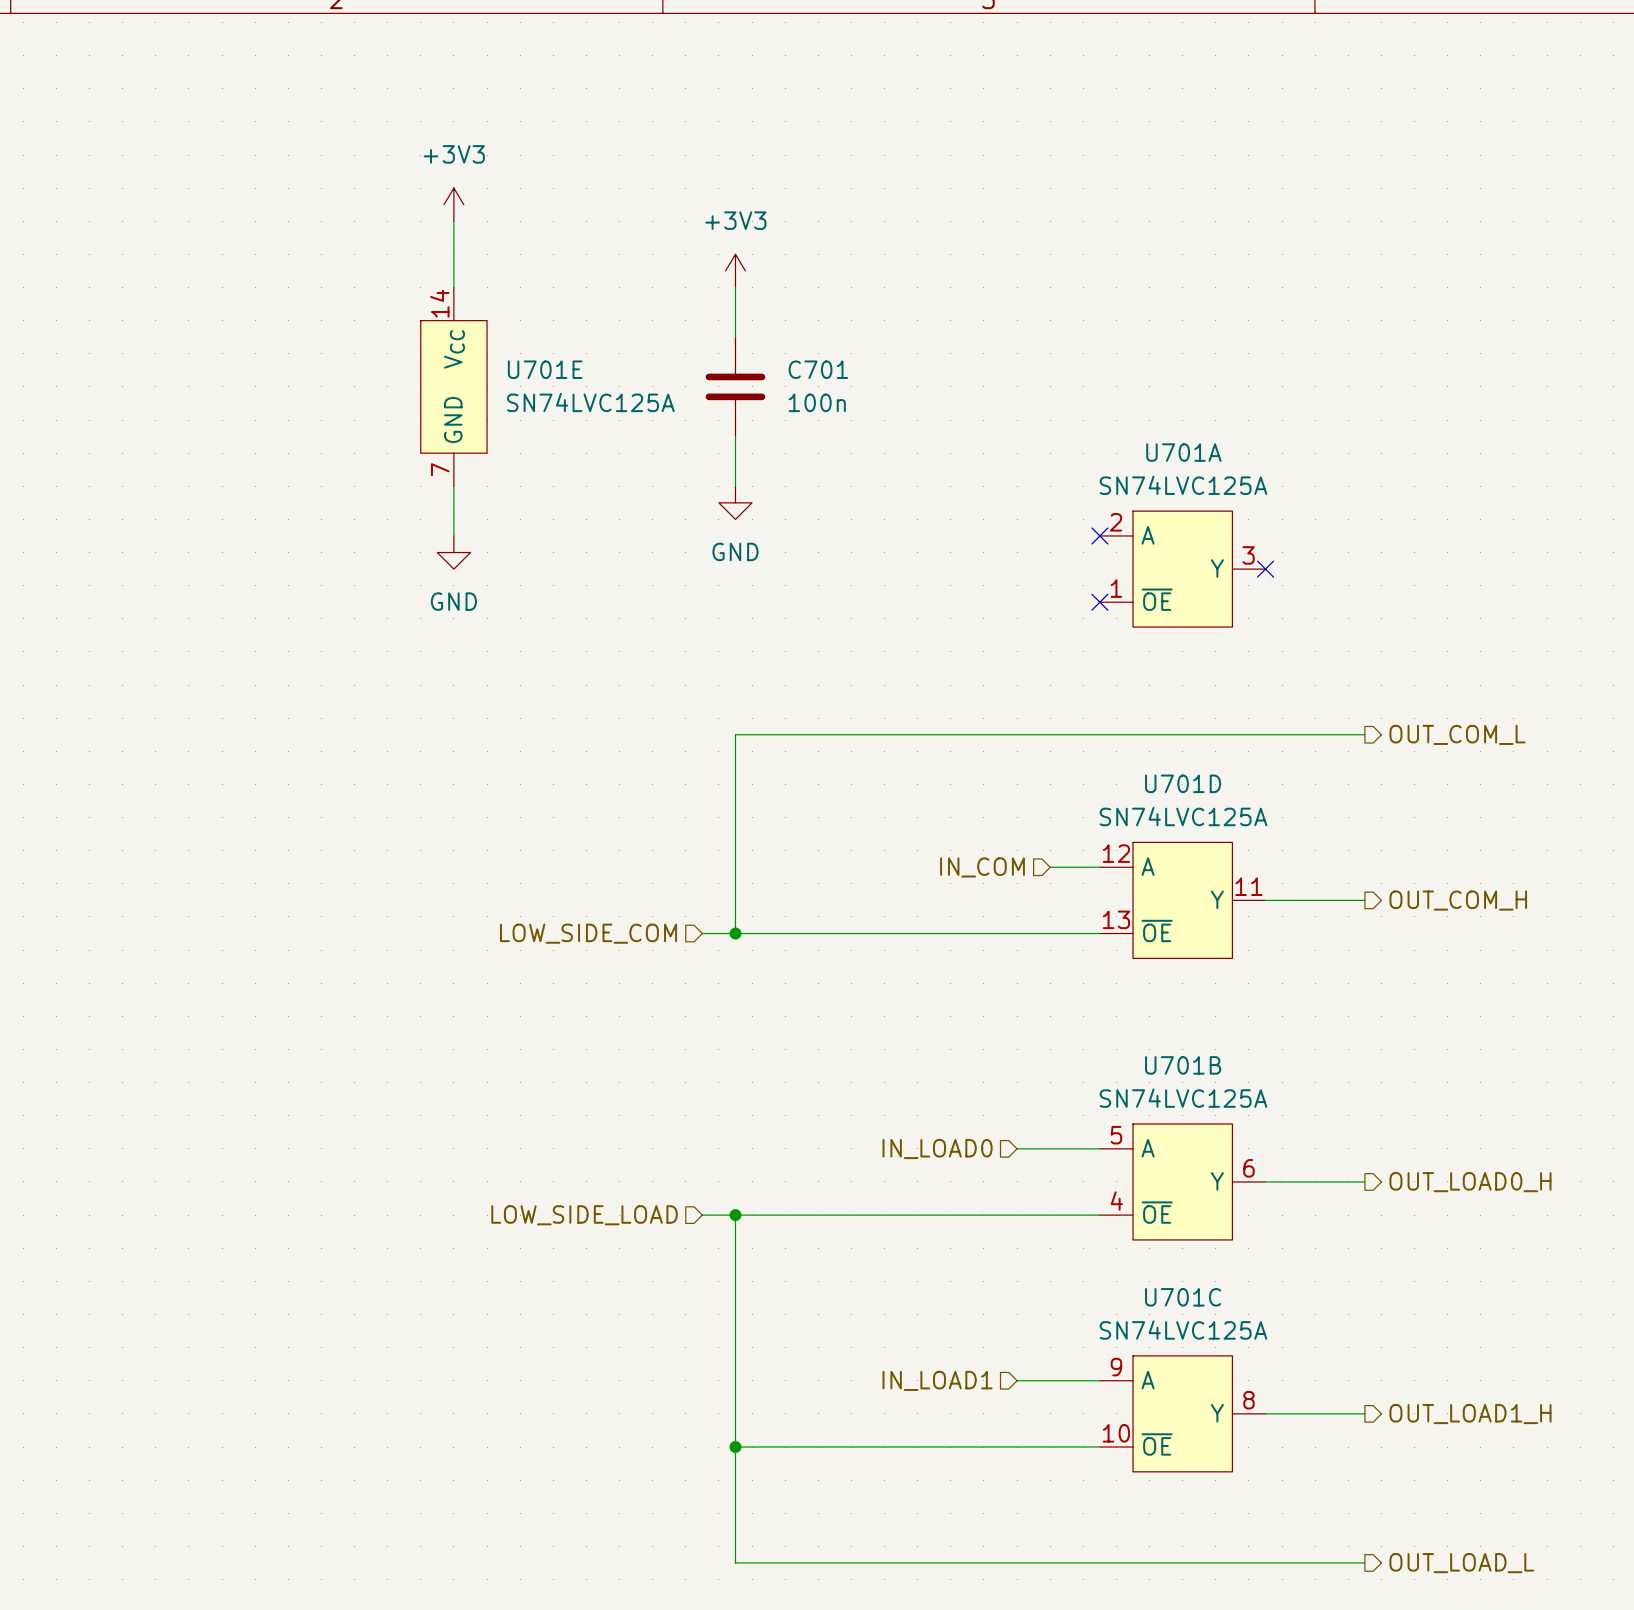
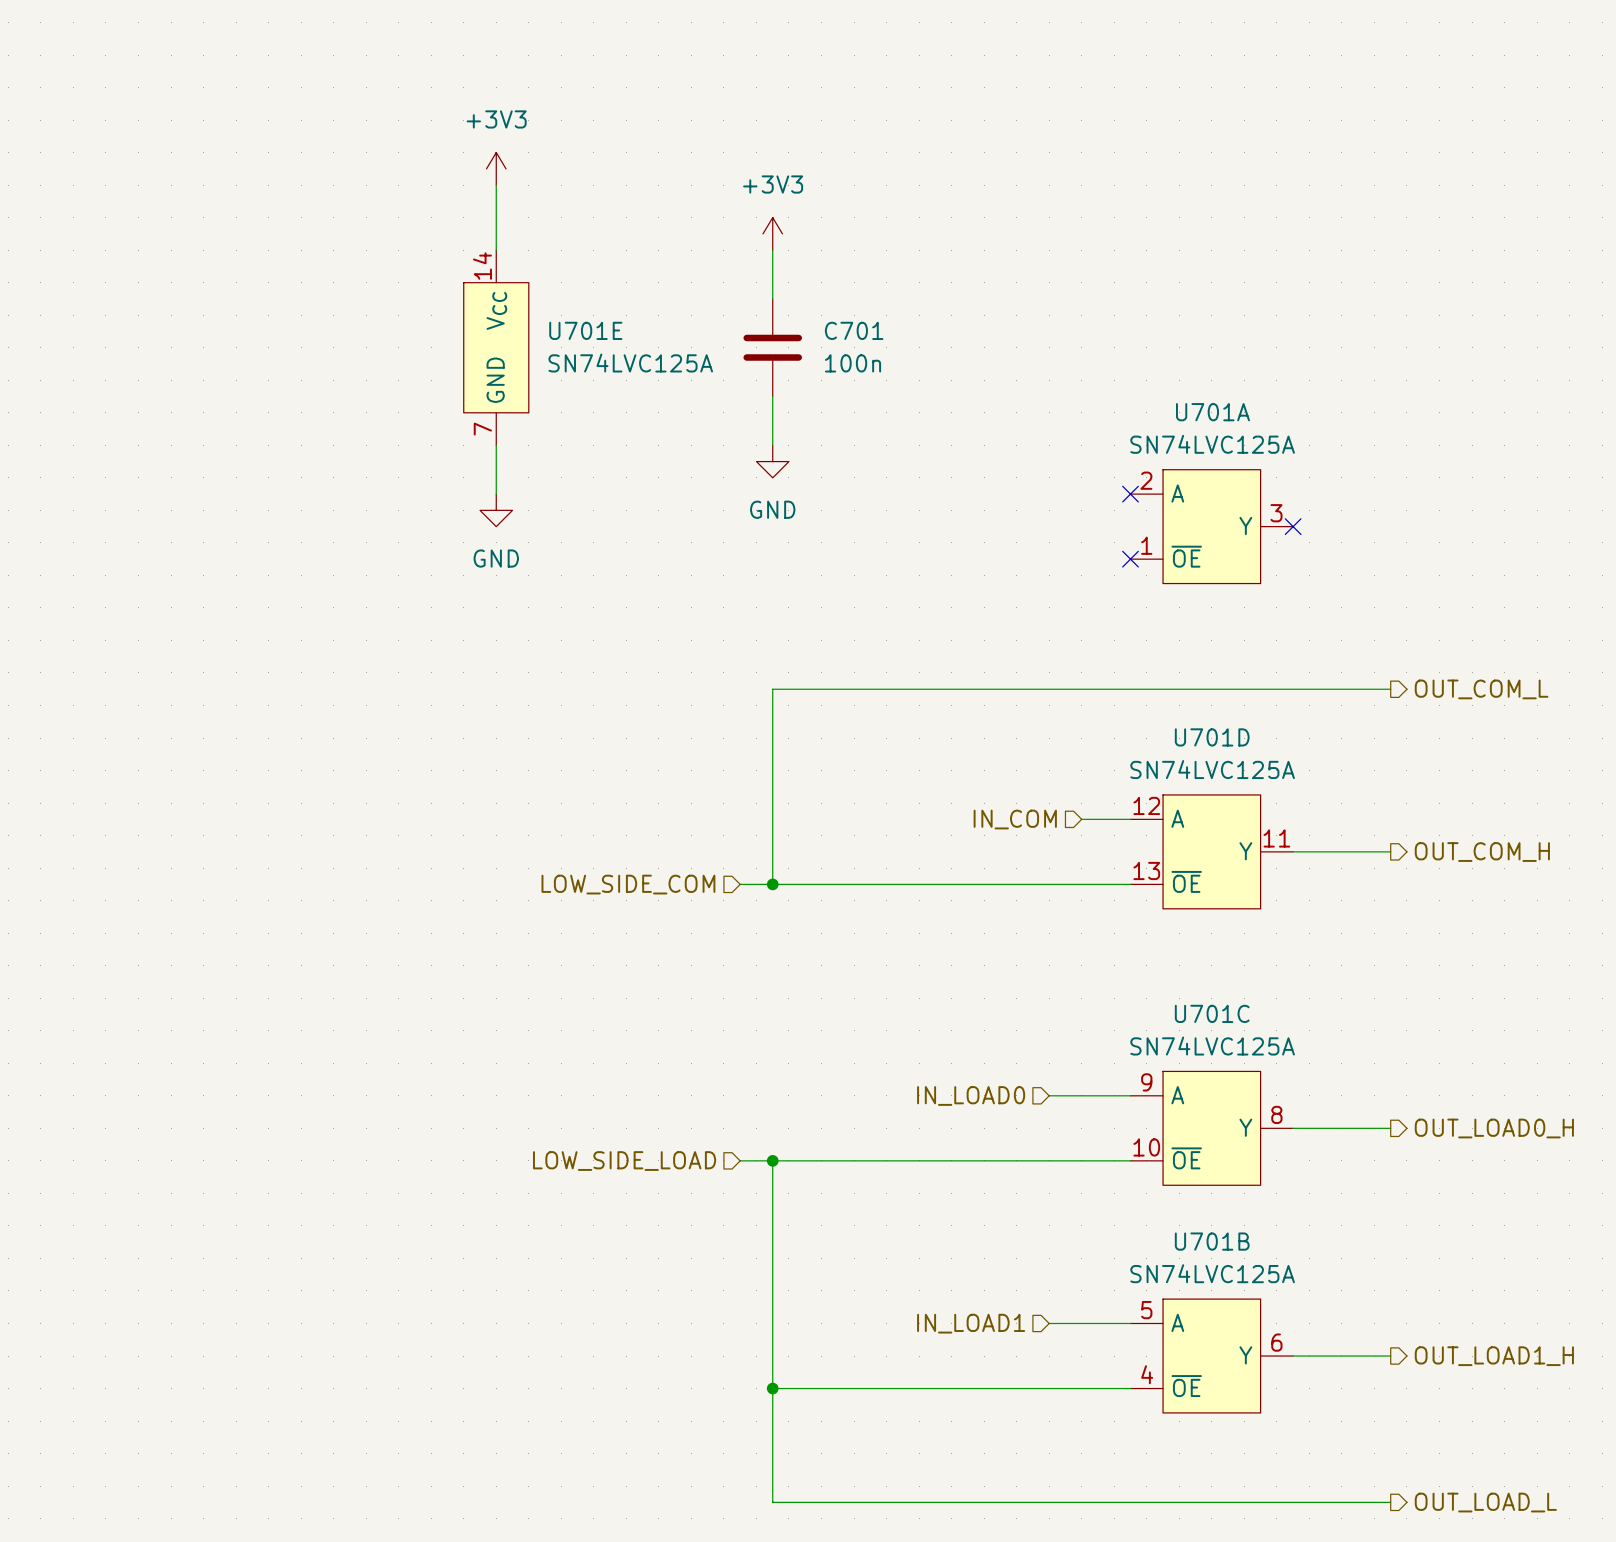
U701B position: (1182, 1181) -> (1211, 1356)
U701C position: (1182, 1413) -> (1211, 1128)

